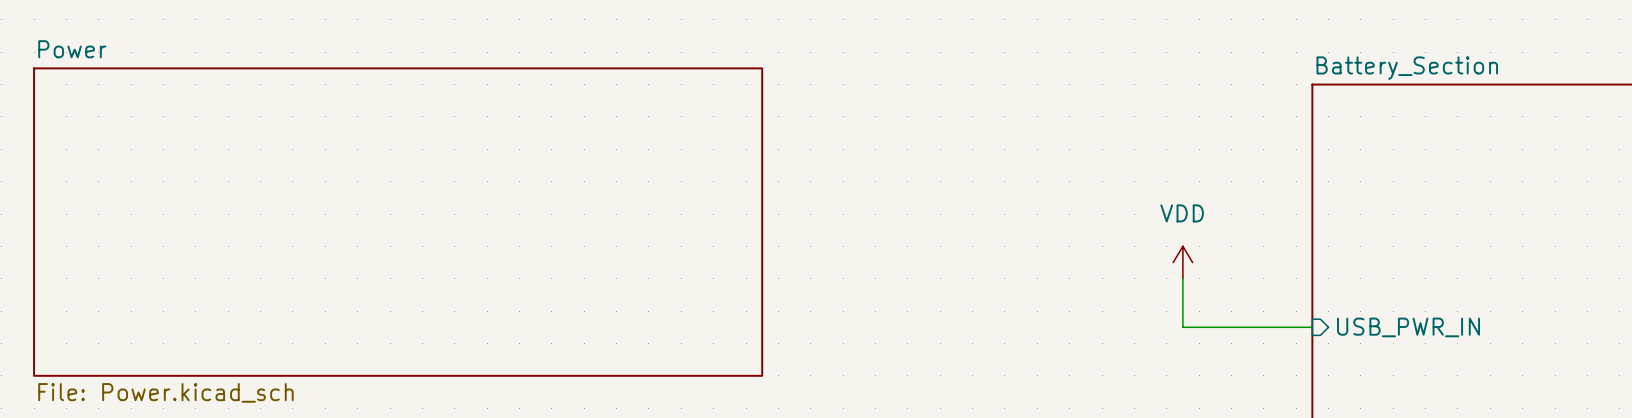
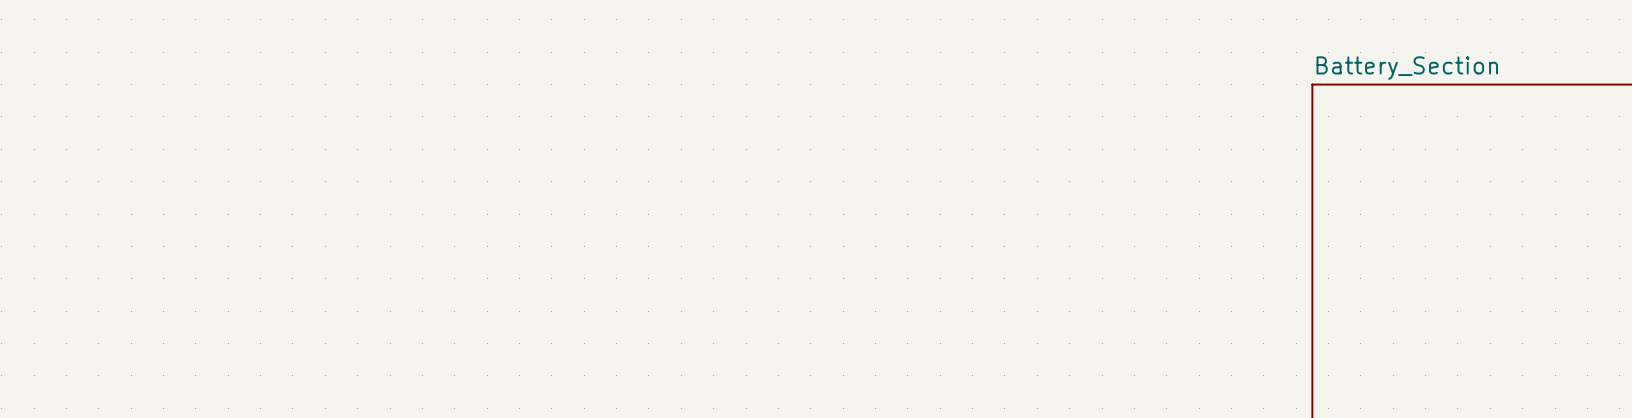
sheet Power: File: Power.kicad_sch (398, 222) -> none
power symbol: VDD (1182, 262) -> none
wire: (1182, 278) (1182, 327) (1312, 327) -> none
sheet pin: USB_PWR_IN (1408, 327) -> none

